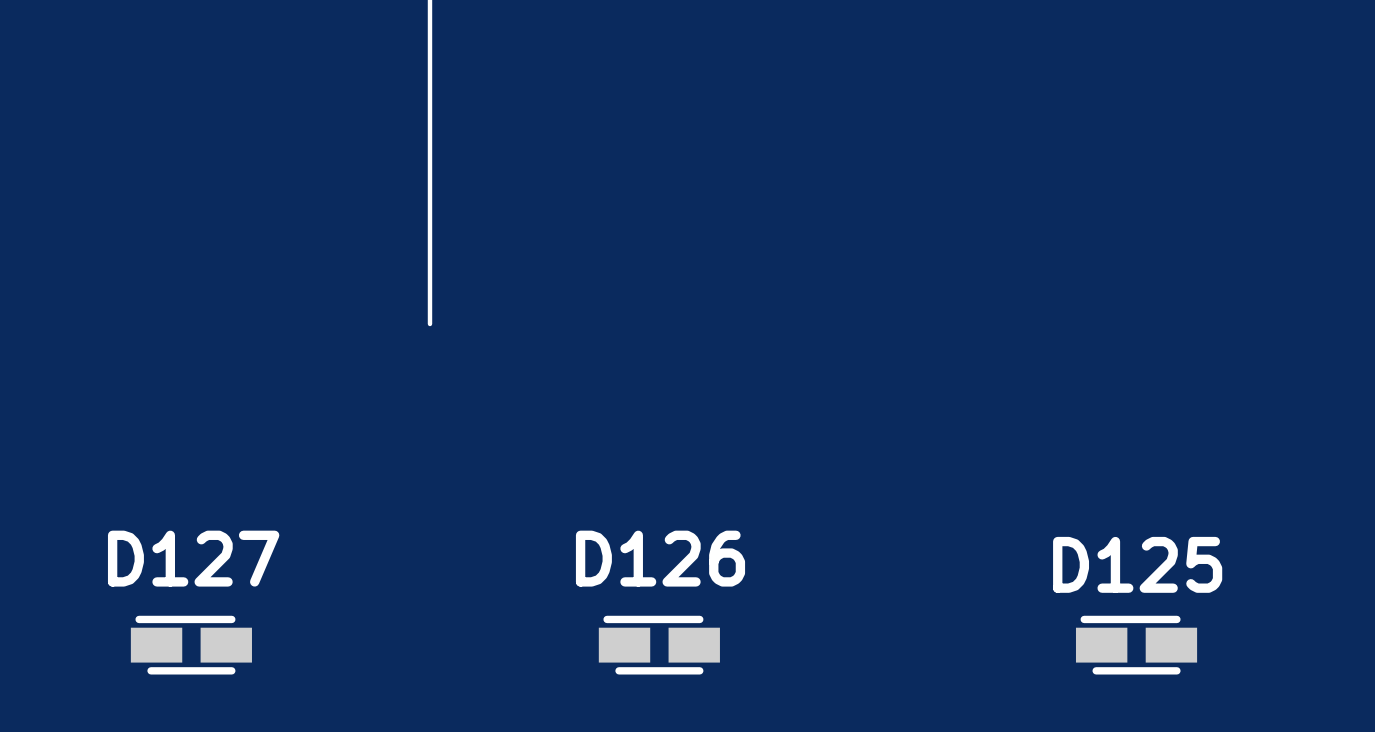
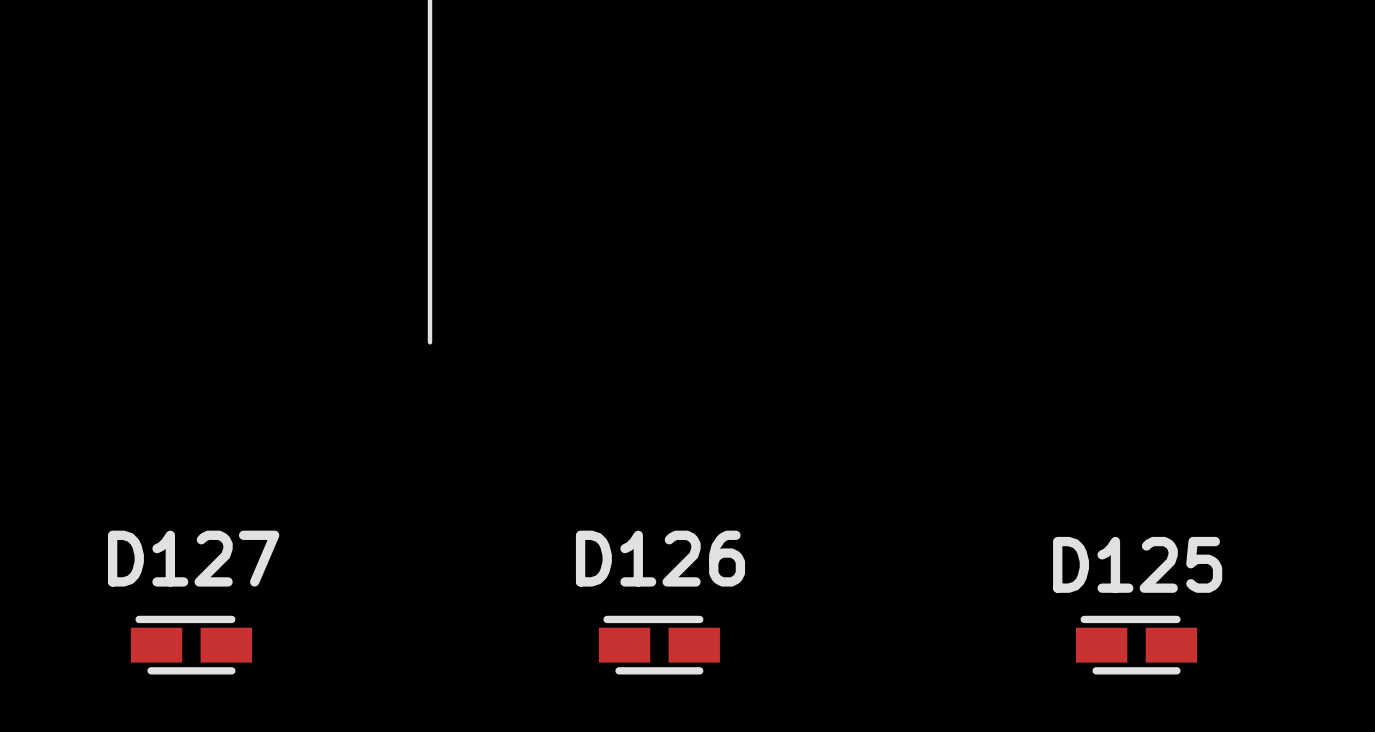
line: none -> (429, 323) (429, 342)

